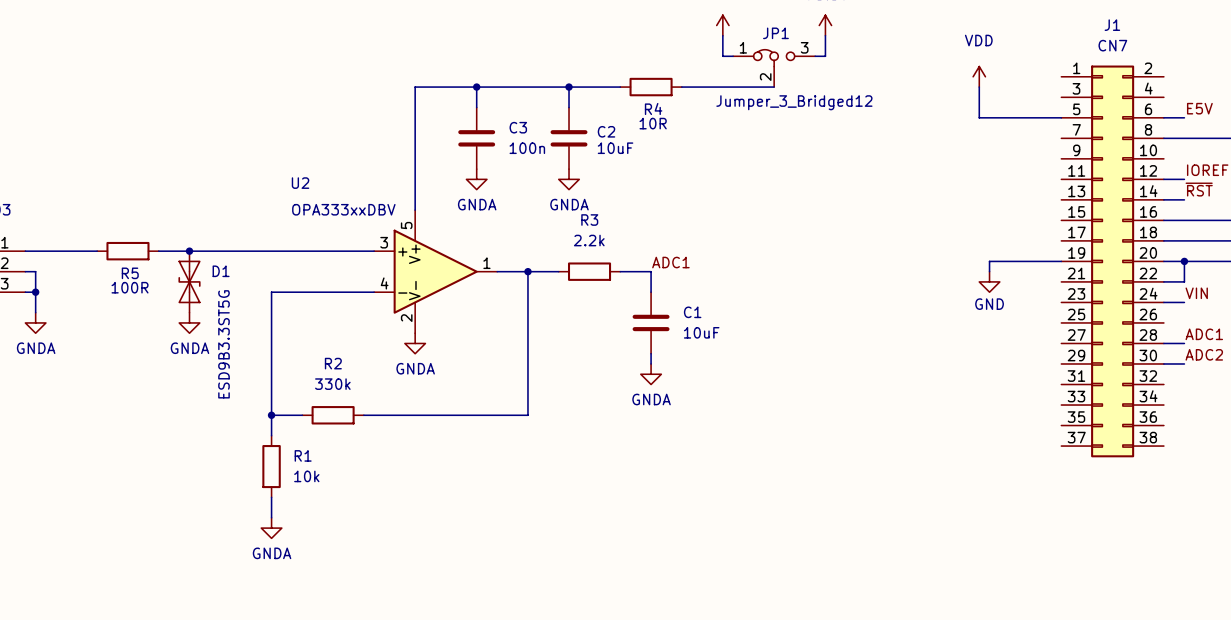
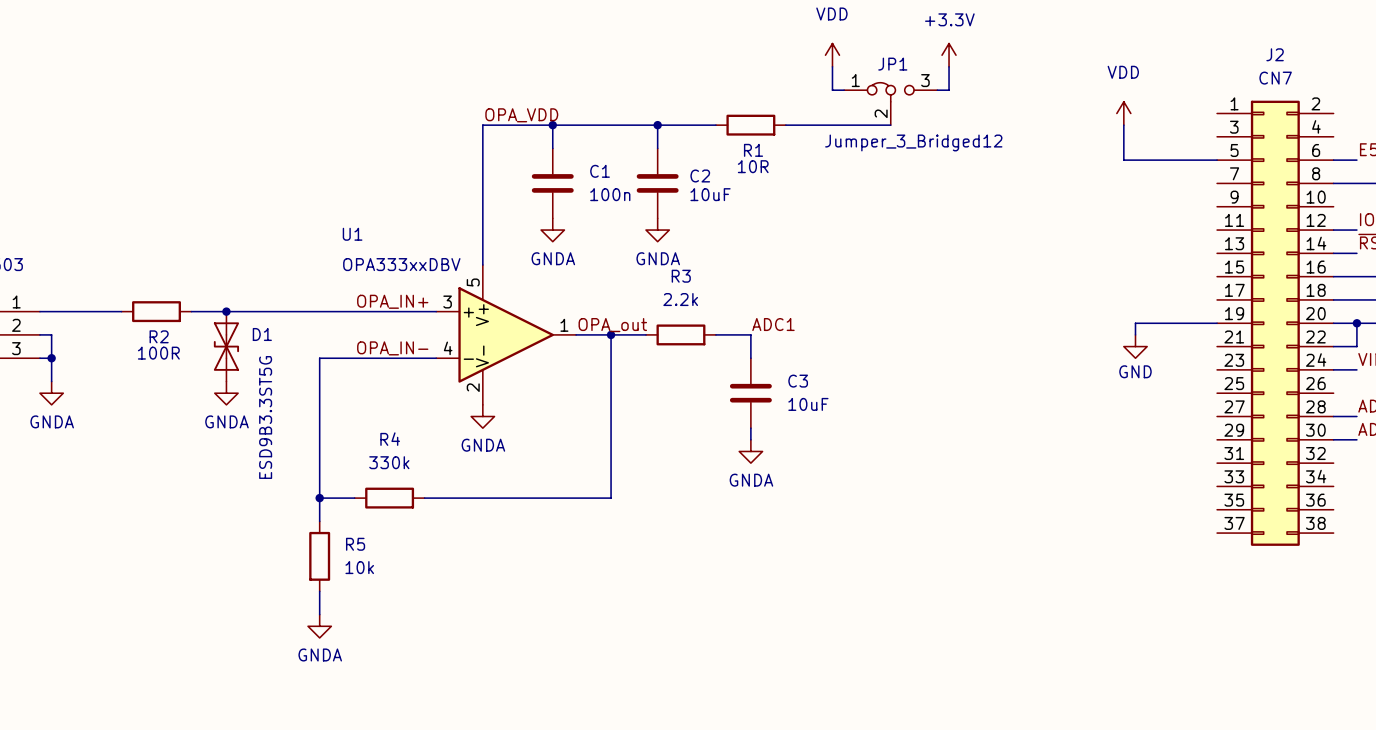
J1 name: J1 (1112, 25) -> J2 (1275, 54)
label: none -> OPA_VDD (521, 115)
R4 name: R4 (653, 108) -> R1 (753, 150)
C3 name: C3 (518, 127) -> C1 (600, 171)
U2 name: U2 (300, 183) -> U1 (352, 234)
label: none -> OPA_IN+ (392, 301)
label: none -> OPA_out (612, 325)
R5 name: R5 (130, 273) -> R2 (159, 336)
label: none -> OPA_IN- (392, 348)
C1 name: C1 (692, 312) -> C3 (798, 381)
R2 name: R2 (333, 363) -> R4 (390, 439)
R1 name: R1 (303, 455) -> R5 (355, 544)

